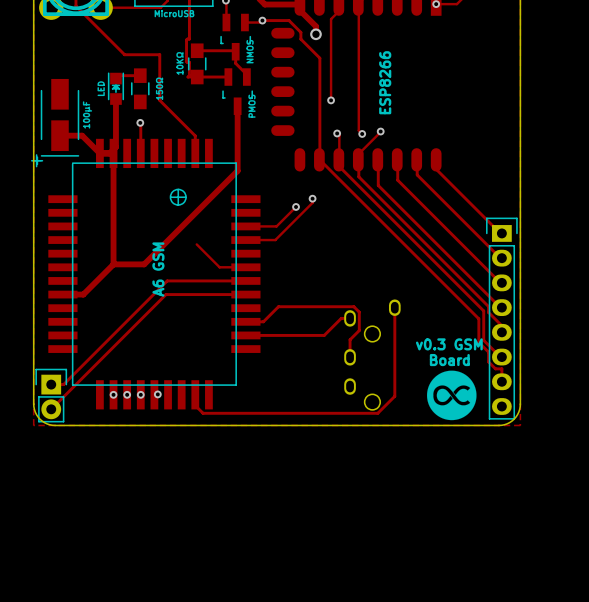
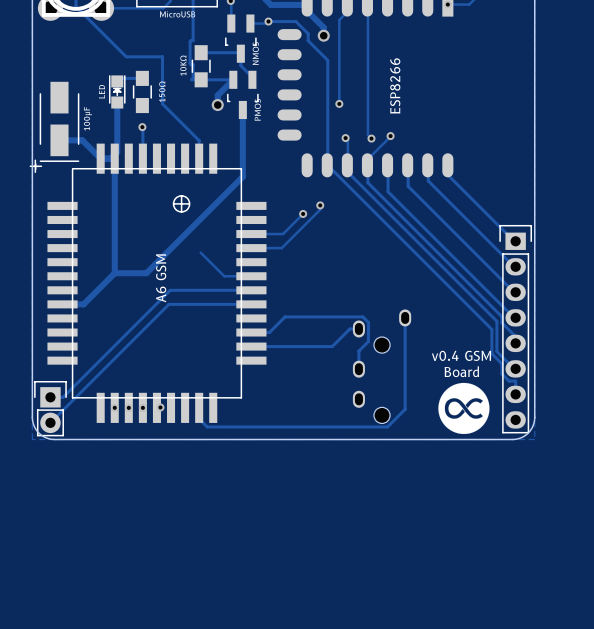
track: none -> (233, 79) (217, 95) (217, 105)
via: none -> (217, 105)
text: v0.3 GSM (449, 344) -> v0.4 GSM (461, 355)

